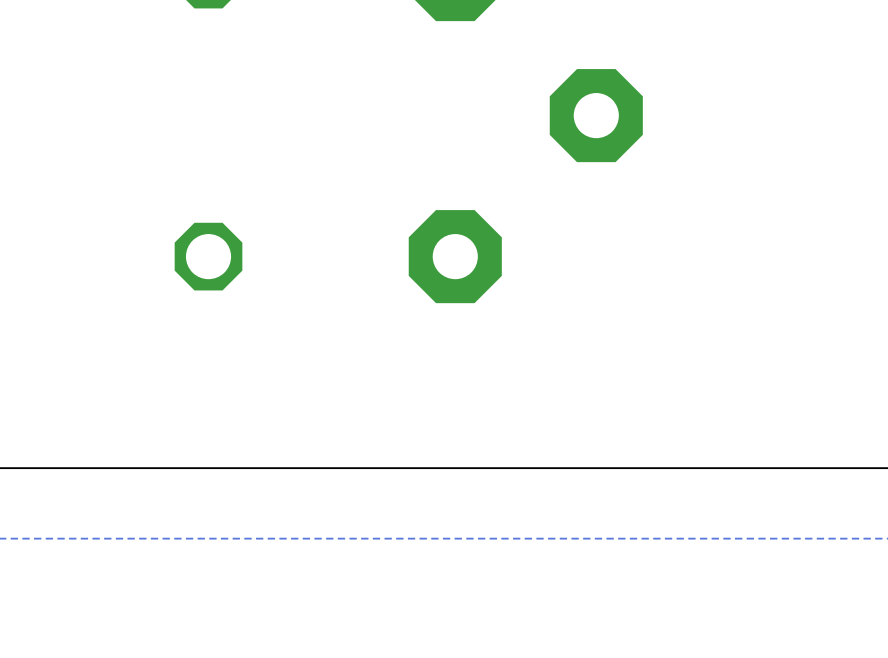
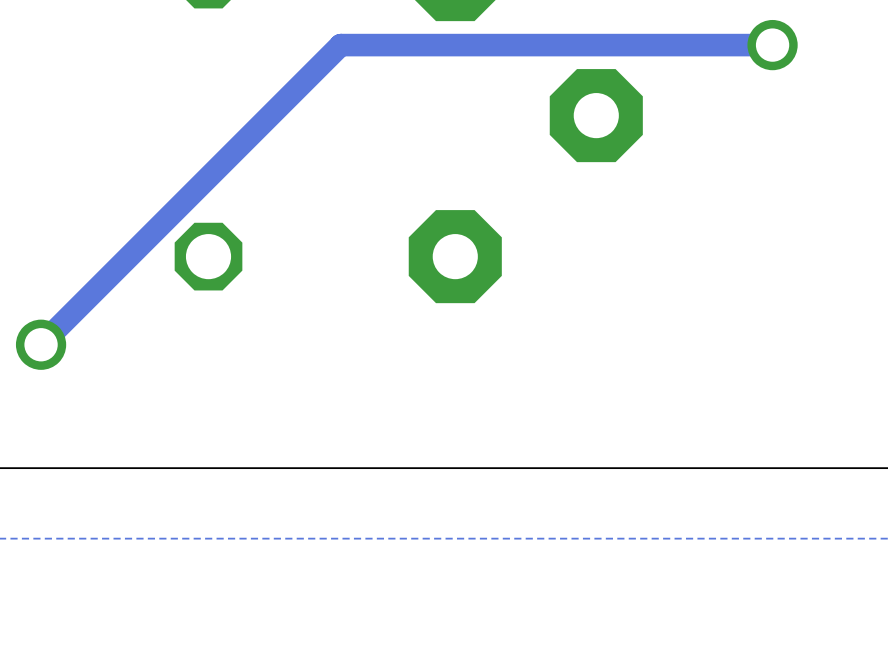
track: none -> (772, 45) (340, 45) (41, 344)
via: none -> (772, 45)
via: none -> (41, 344)

